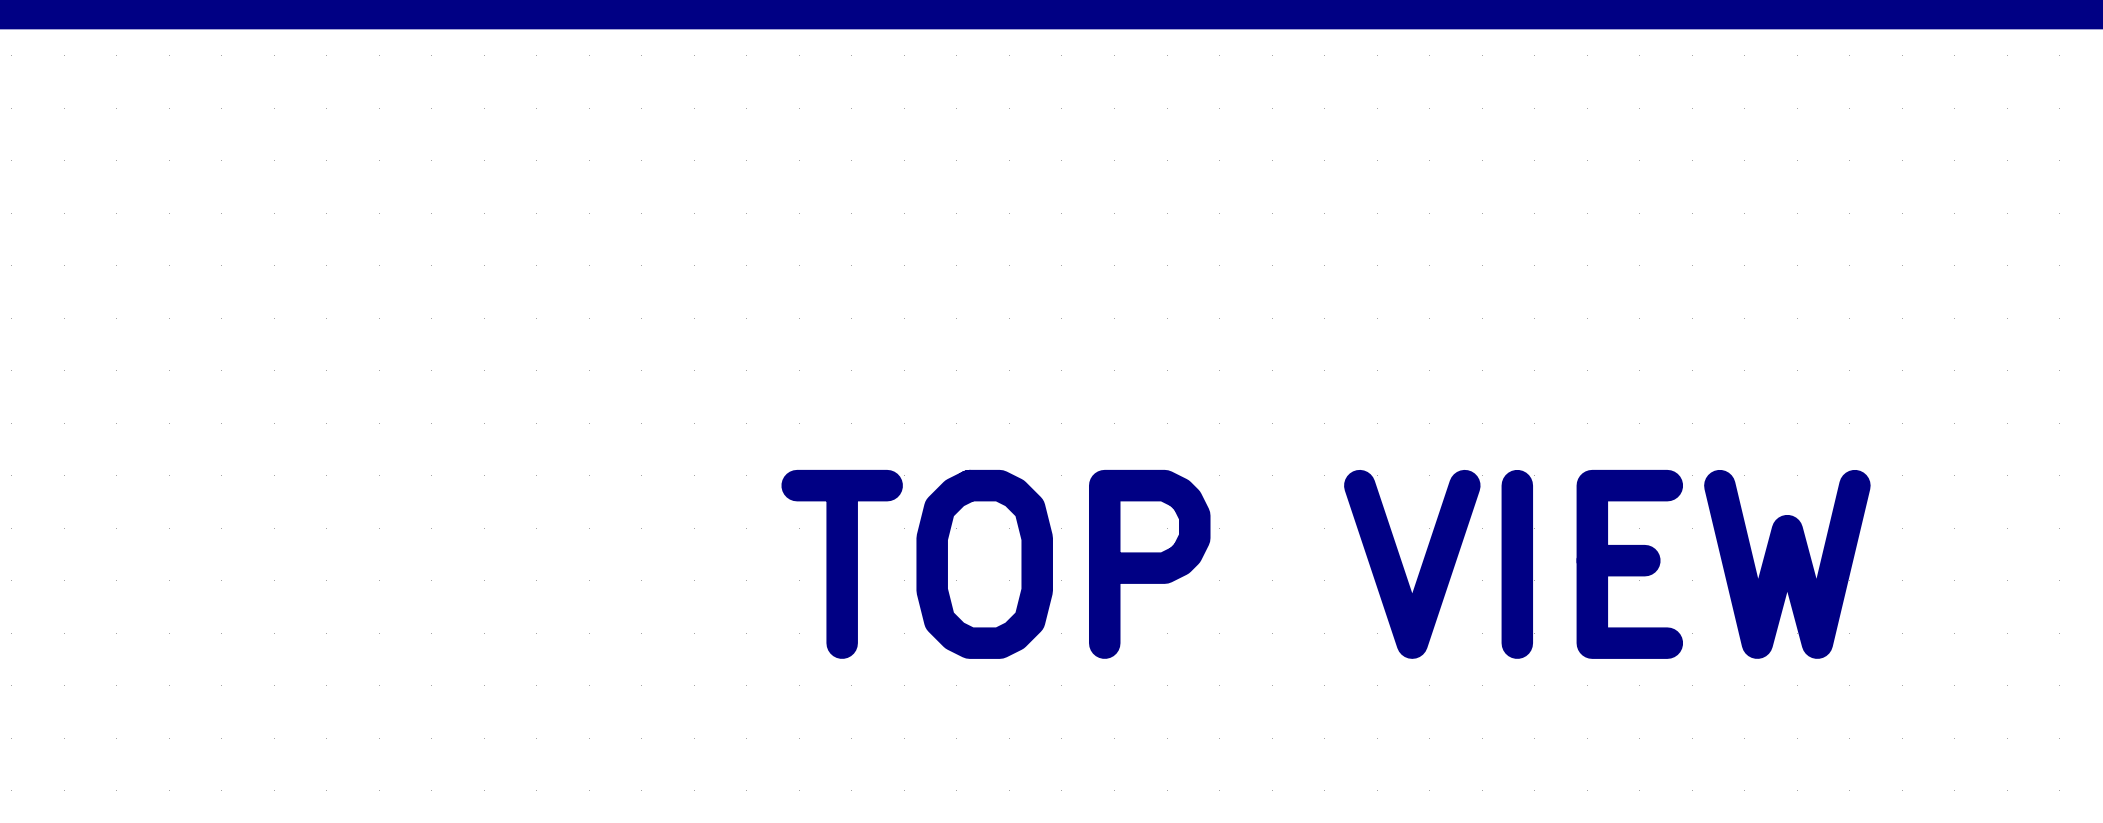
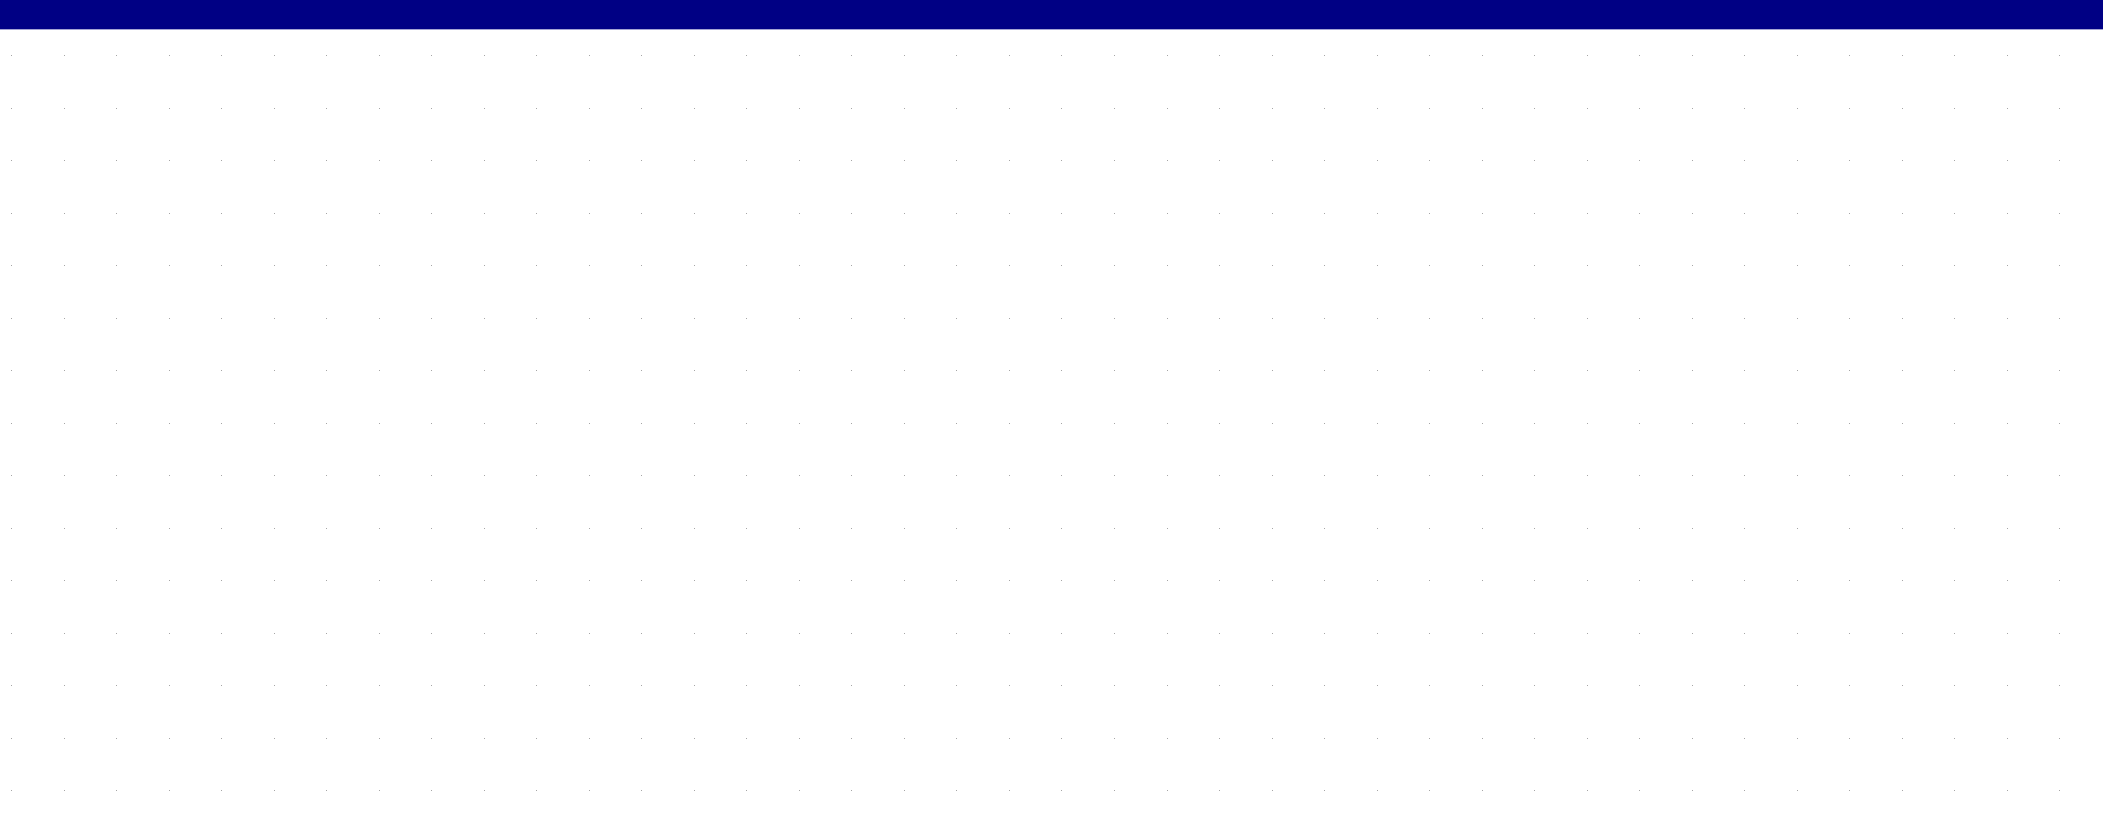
text: TOP VIEW (1326, 564) -> none

